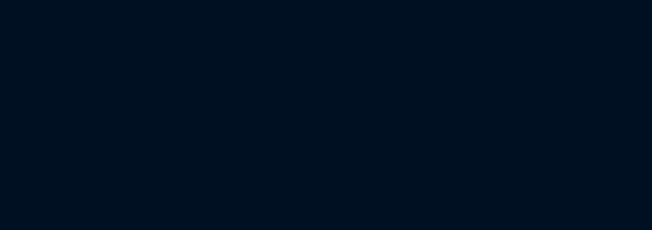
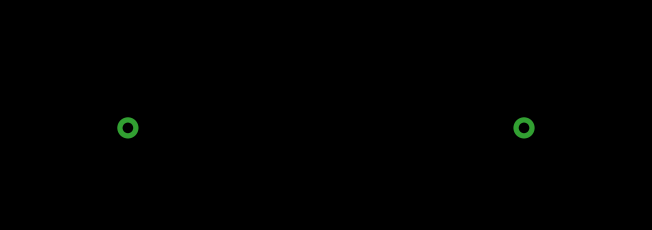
via: none -> (127, 127)
via: none -> (524, 127)

